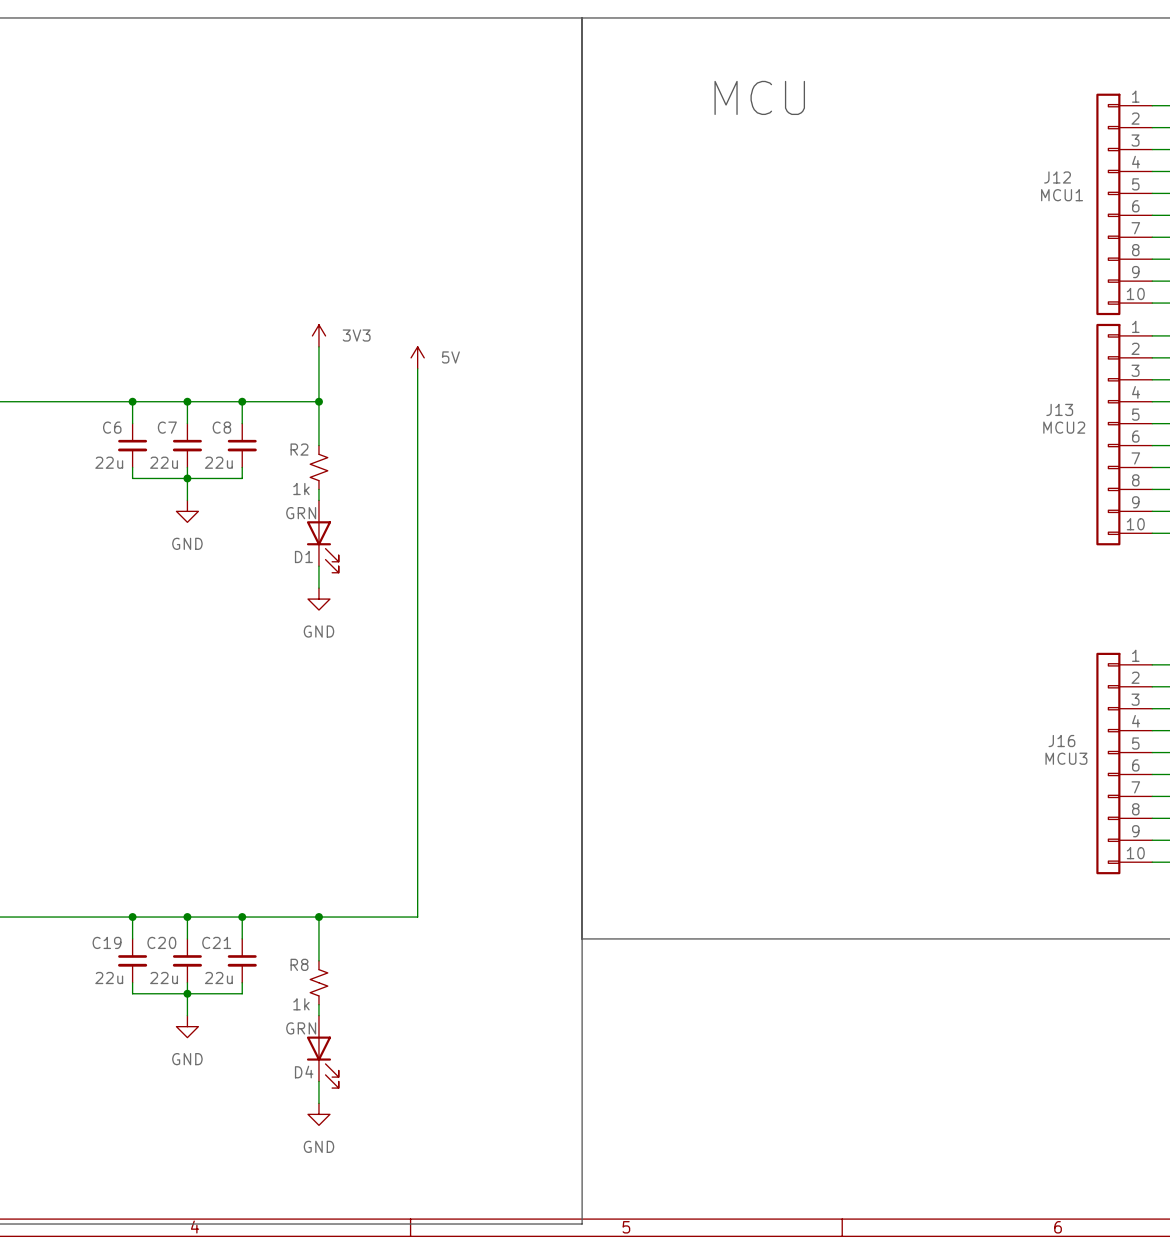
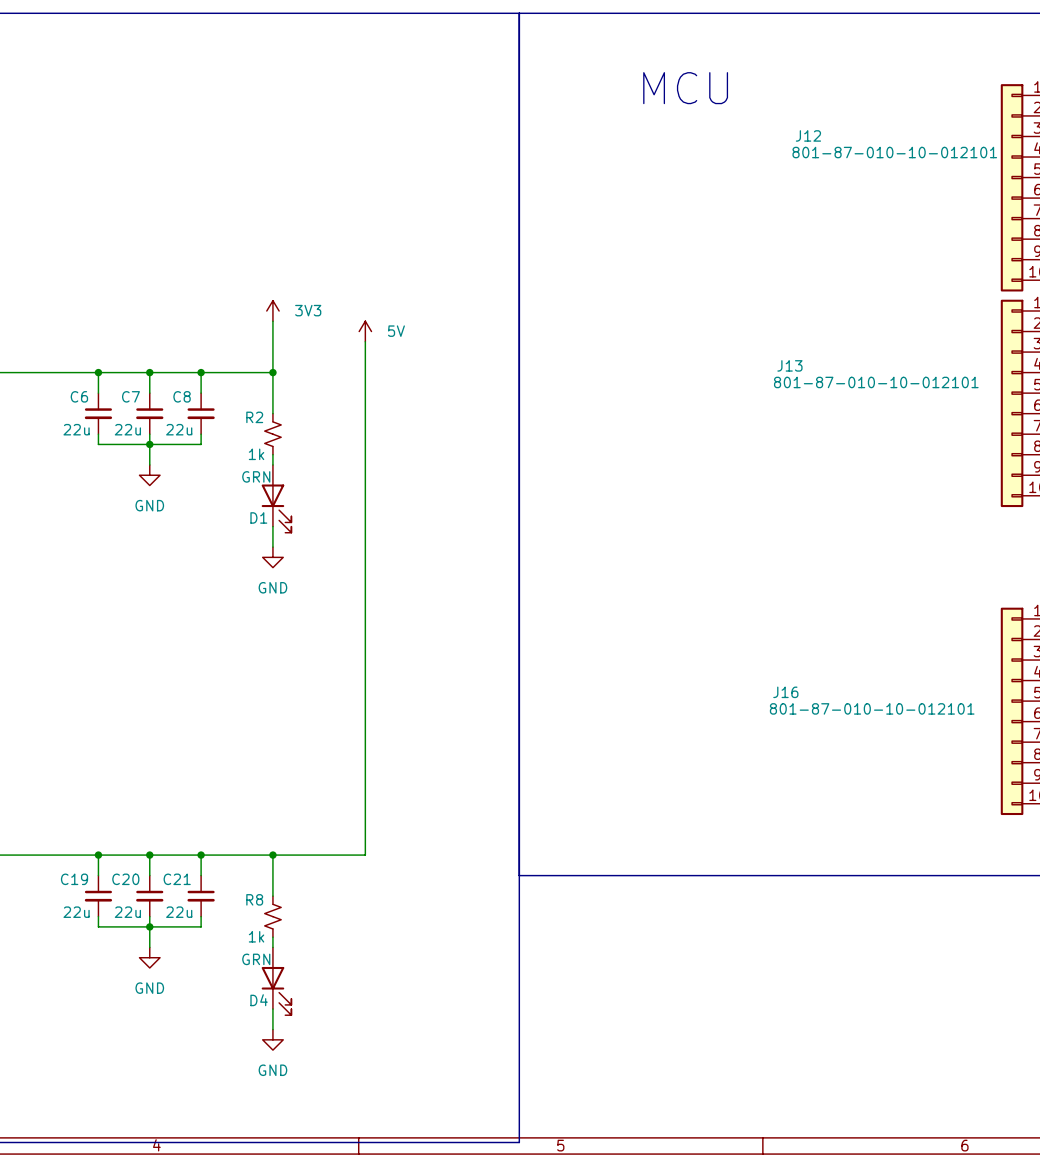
J12 name position: J12 (1057, 177) -> J12 (808, 135)
J12 value: MCU1 (1062, 195) -> 801-87-010-10-012101 (894, 152)
J13 name position: J13 (1059, 409) -> J13 (789, 365)
J13 value: MCU2 (1064, 427) -> 801-87-010-10-012101 (876, 382)
J16 name position: J16 (1061, 741) -> J16 (785, 692)
J16 value: MCU3 (1066, 758) -> 801-87-010-10-012101 (872, 708)

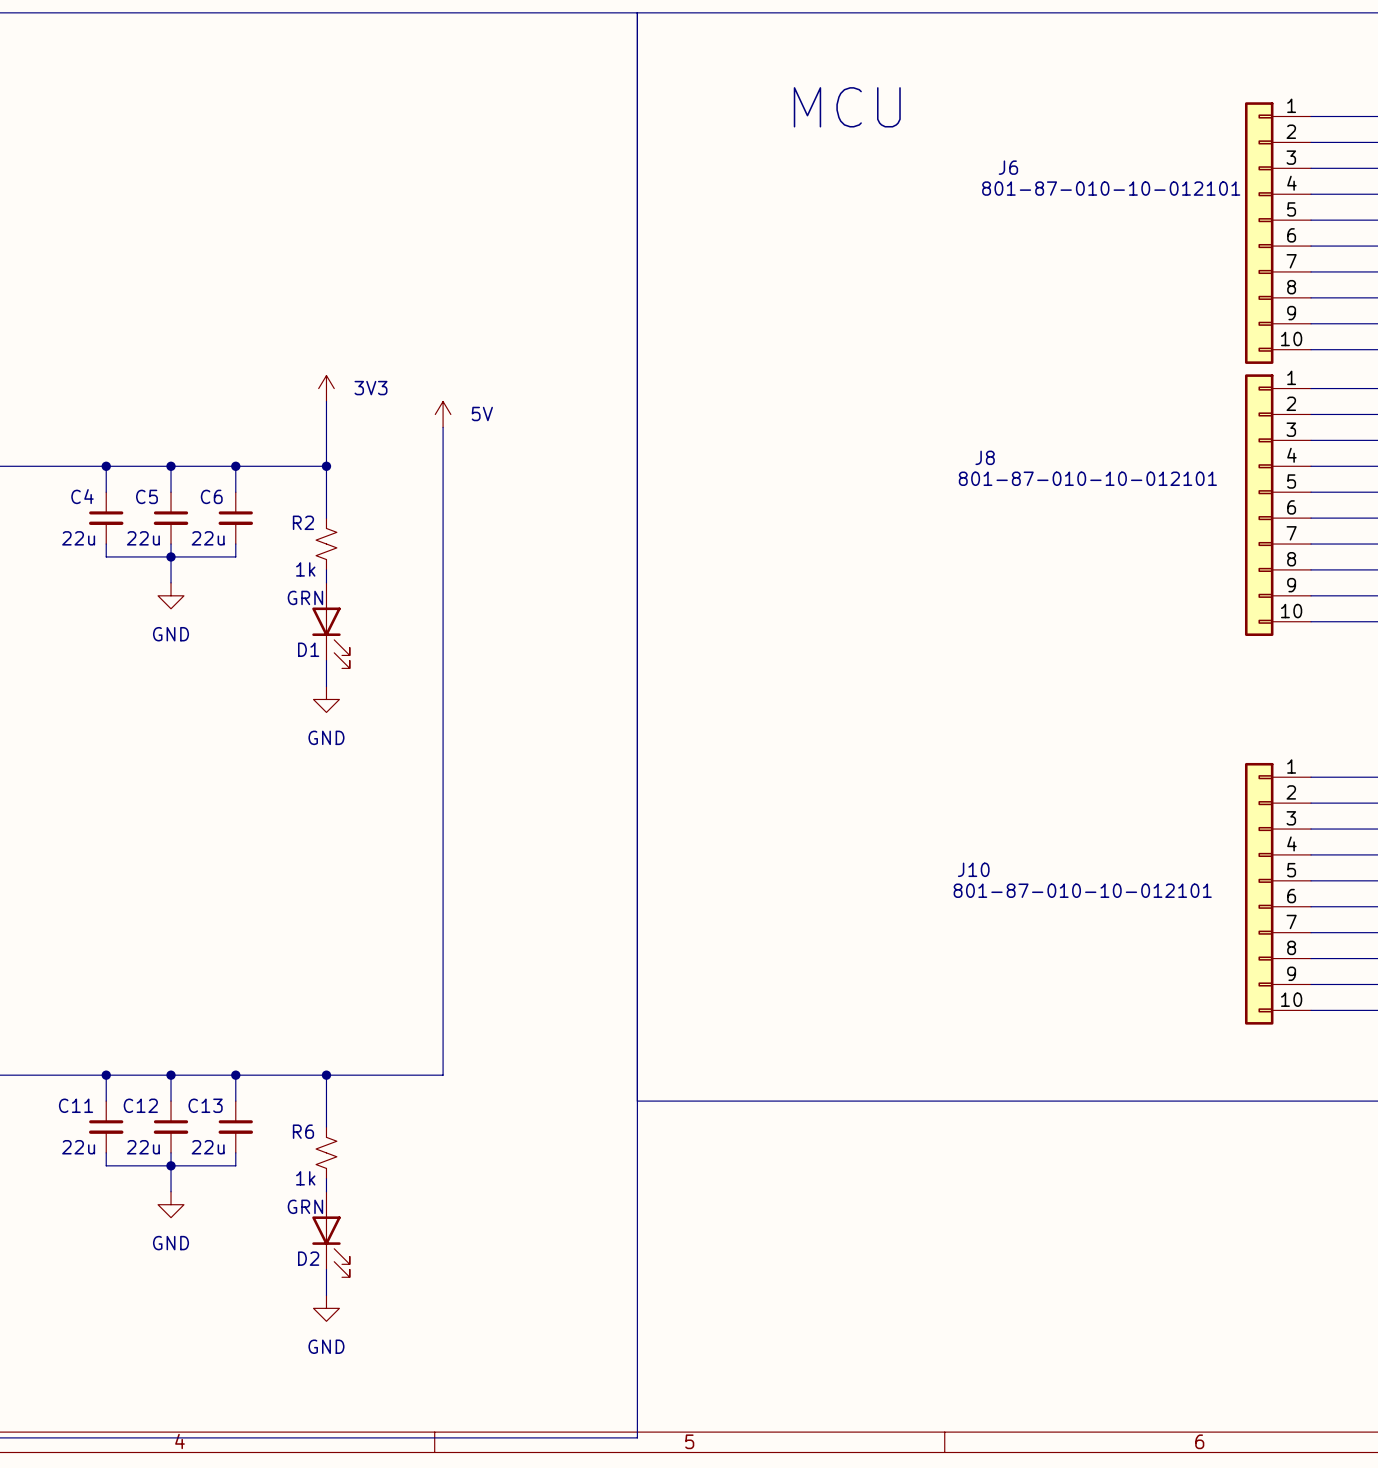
J12 name: J12 (808, 135) -> J6 (1008, 167)
J13 name: J13 (789, 365) -> J8 (985, 457)
C6 name: C6 (79, 396) -> C4 (82, 496)
C7 name: C7 (130, 396) -> C5 (146, 496)
C8 name: C8 (182, 396) -> C6 (211, 496)
J16 name: J16 (785, 692) -> J10 (973, 869)
C19 name: C19 (74, 879) -> C11 (76, 1105)
C20 name: C20 (125, 879) -> C12 (140, 1105)
C21 name: C21 (177, 879) -> C13 (205, 1105)
R8 name: R8 (254, 899) -> R6 (303, 1131)
D4 name: D4 (259, 1000) -> D2 (308, 1258)

